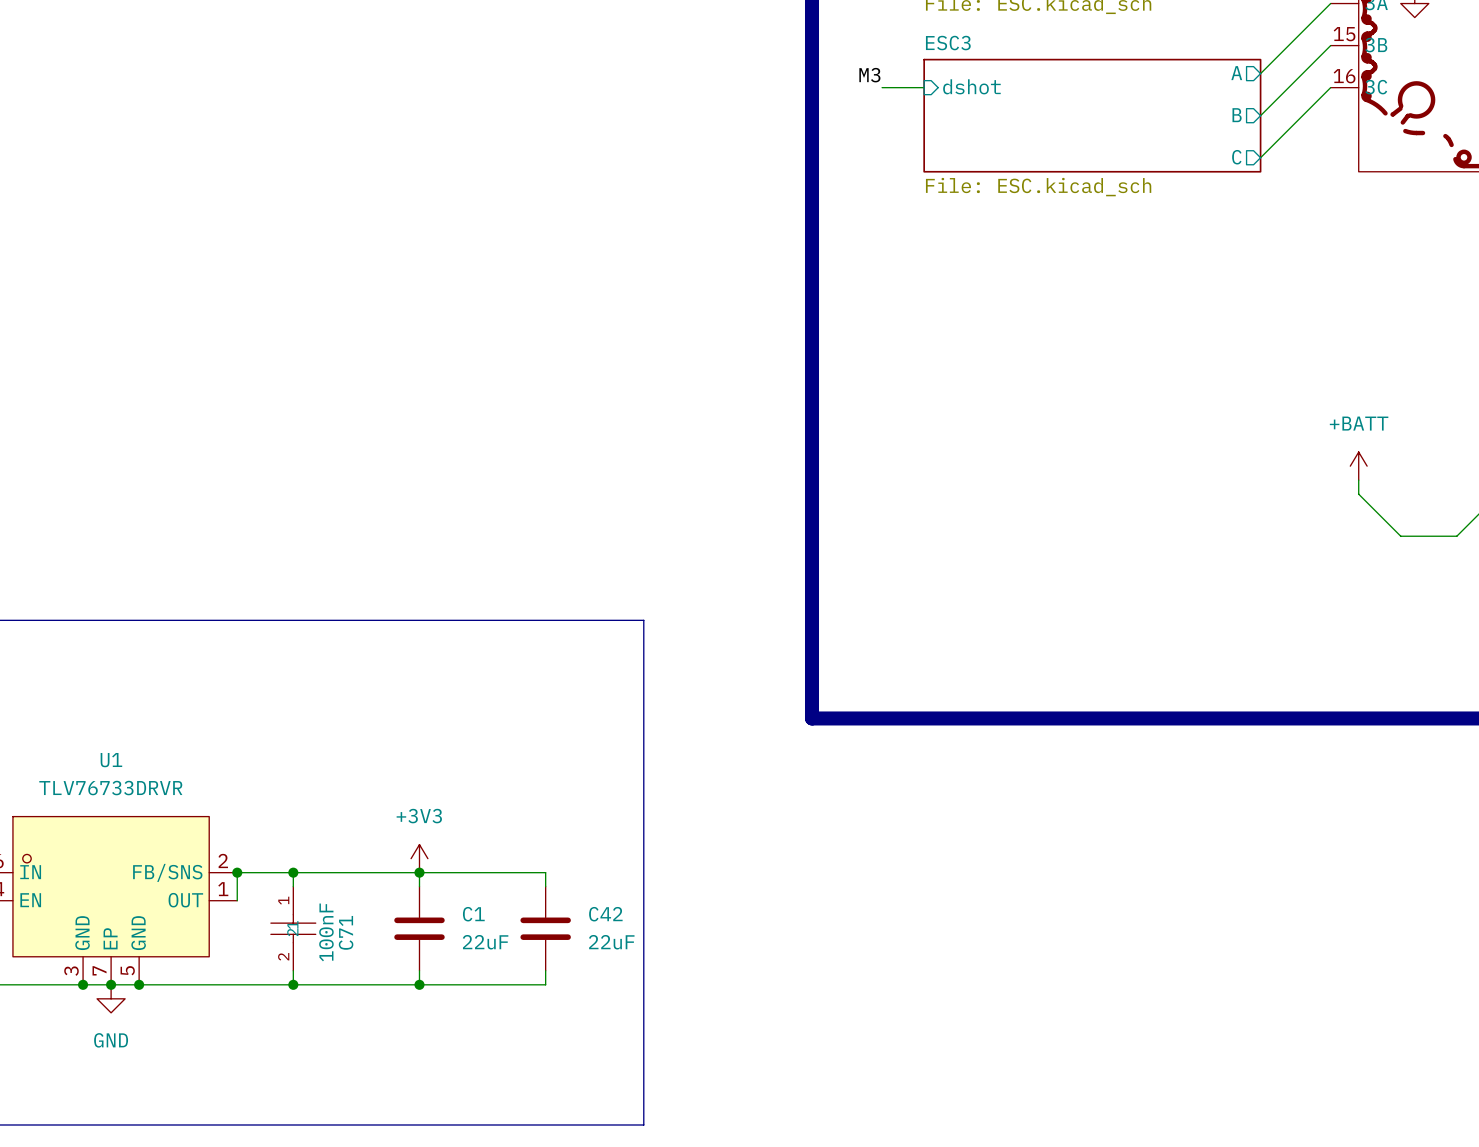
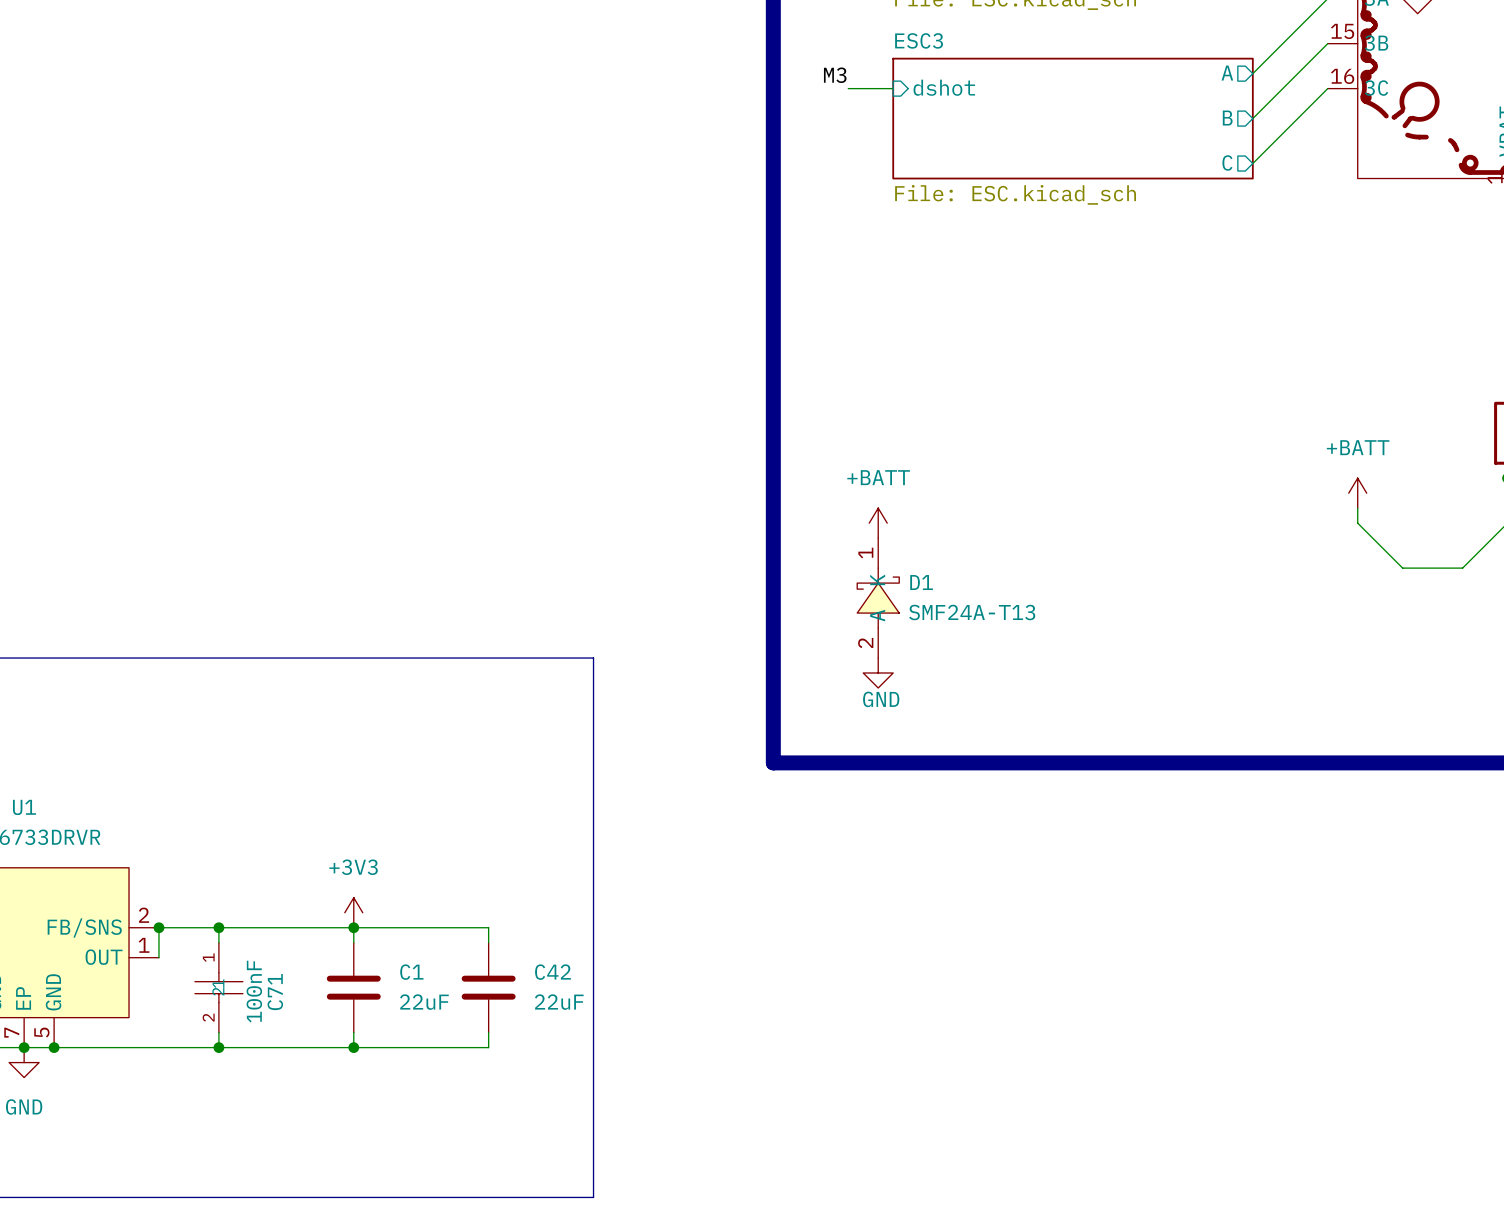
power symbol: none -> +BATT (878, 523)
D1: none -> SMF24A-T13 (878, 598)
power symbol: none -> GND (878, 673)

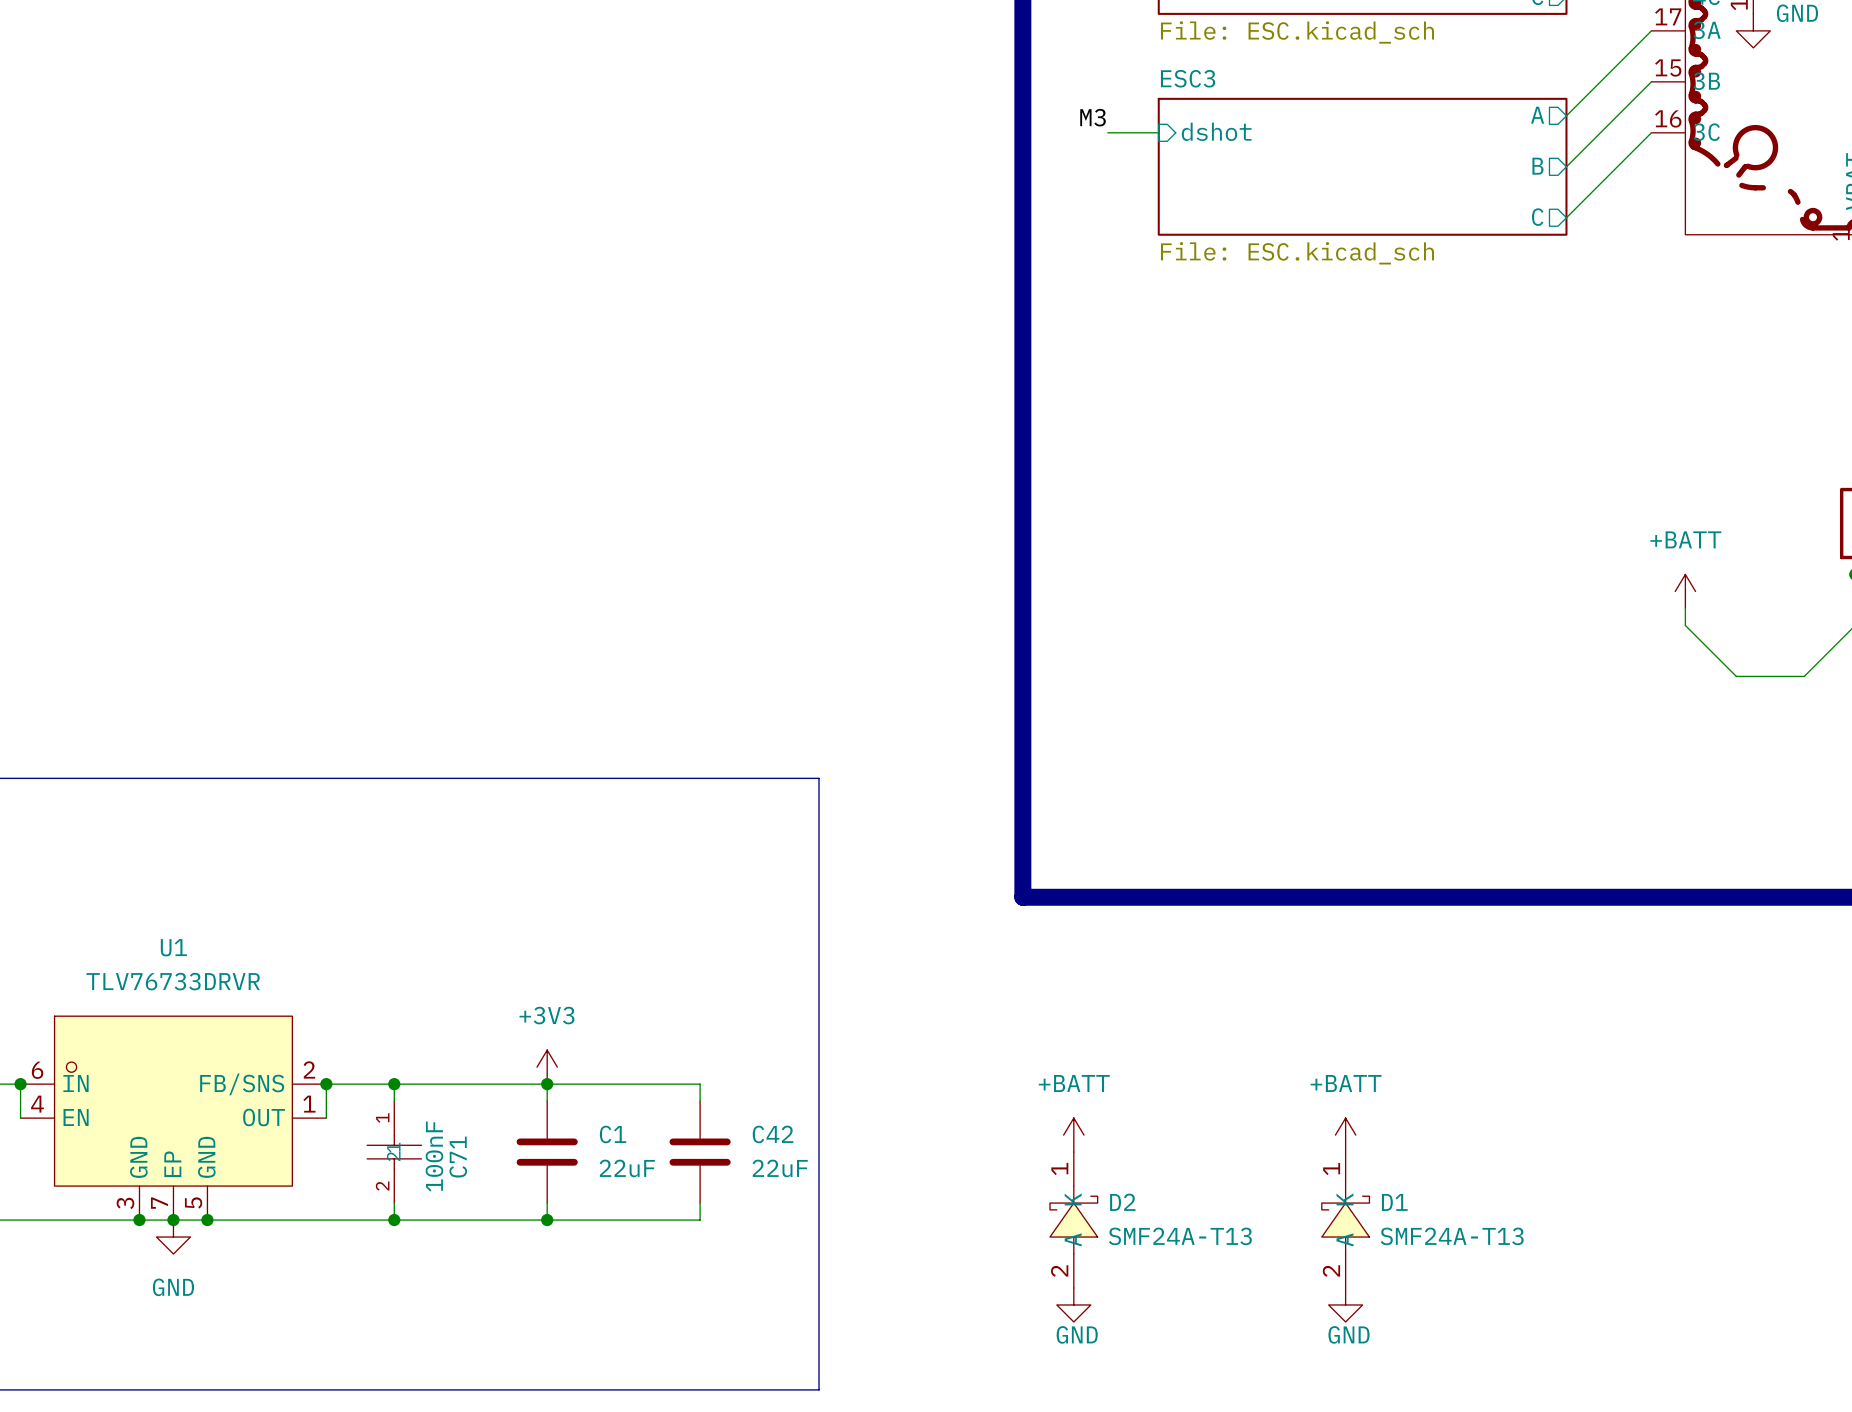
power symbol: +BATT (878, 523) -> none
D1 position: (878, 598) -> (1345, 1220)
power symbol: GND (878, 673) -> none
power symbol: none -> +BATT (1073, 1135)
power symbol: none -> +BATT (1345, 1135)
D2: none -> SMF24A-T13 (1073, 1220)
power symbol: none -> GND (1073, 1304)
power symbol: none -> GND (1345, 1304)

